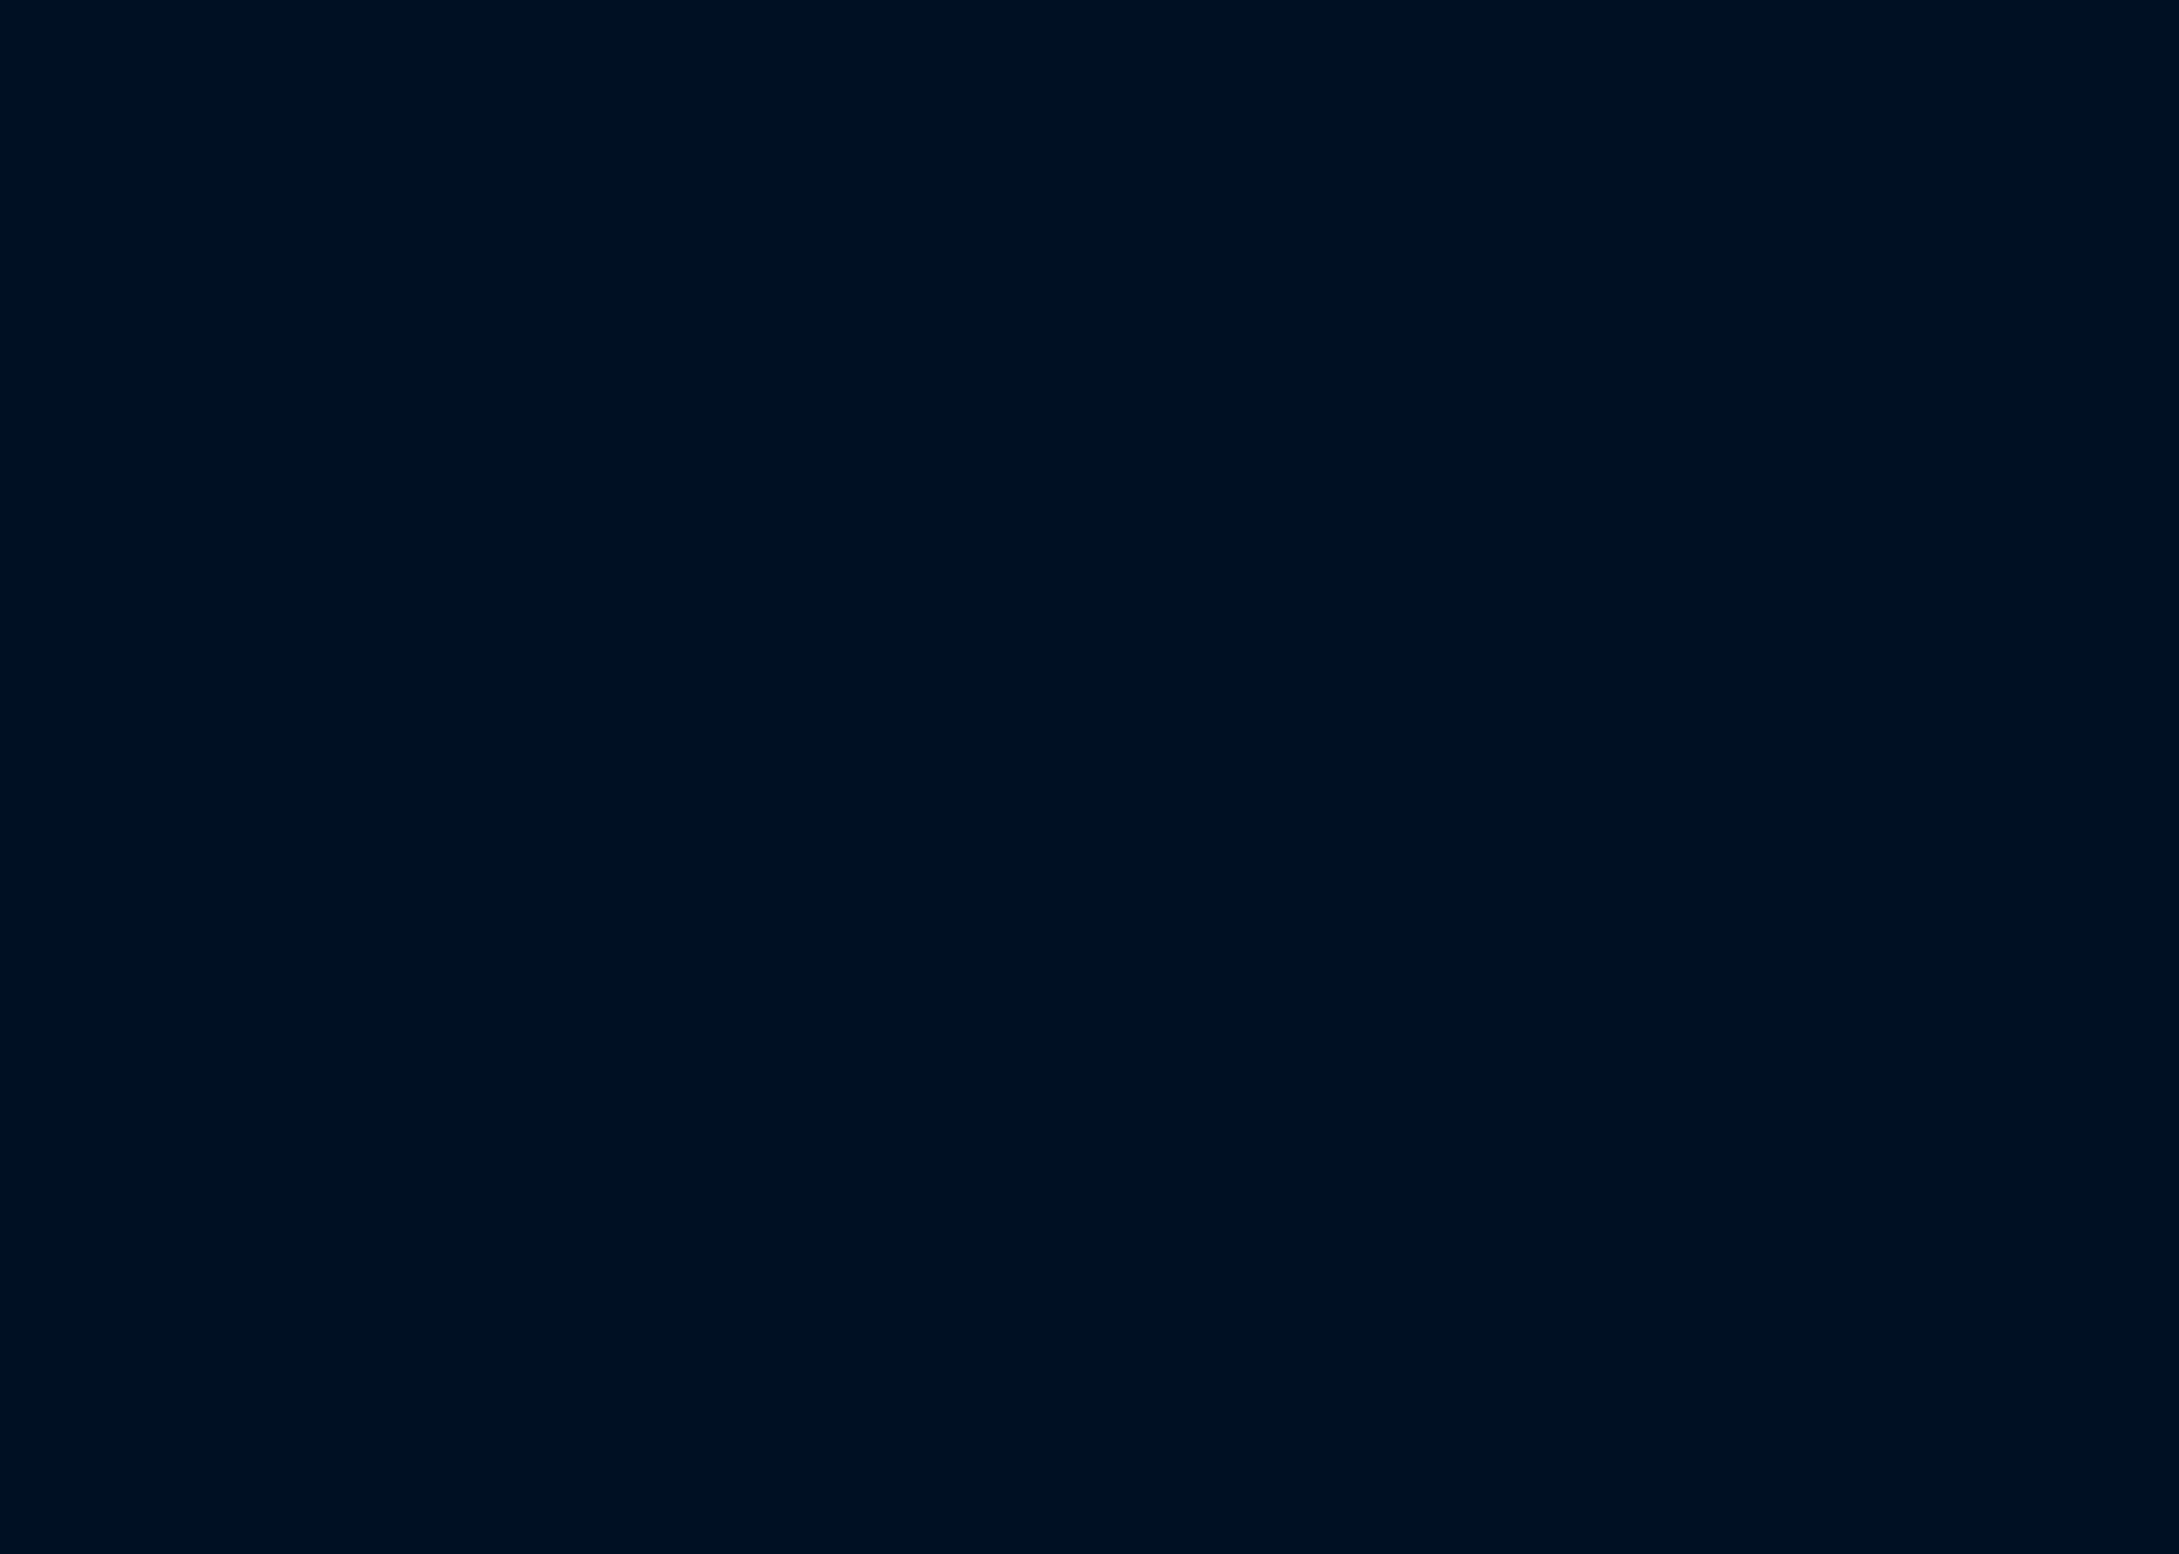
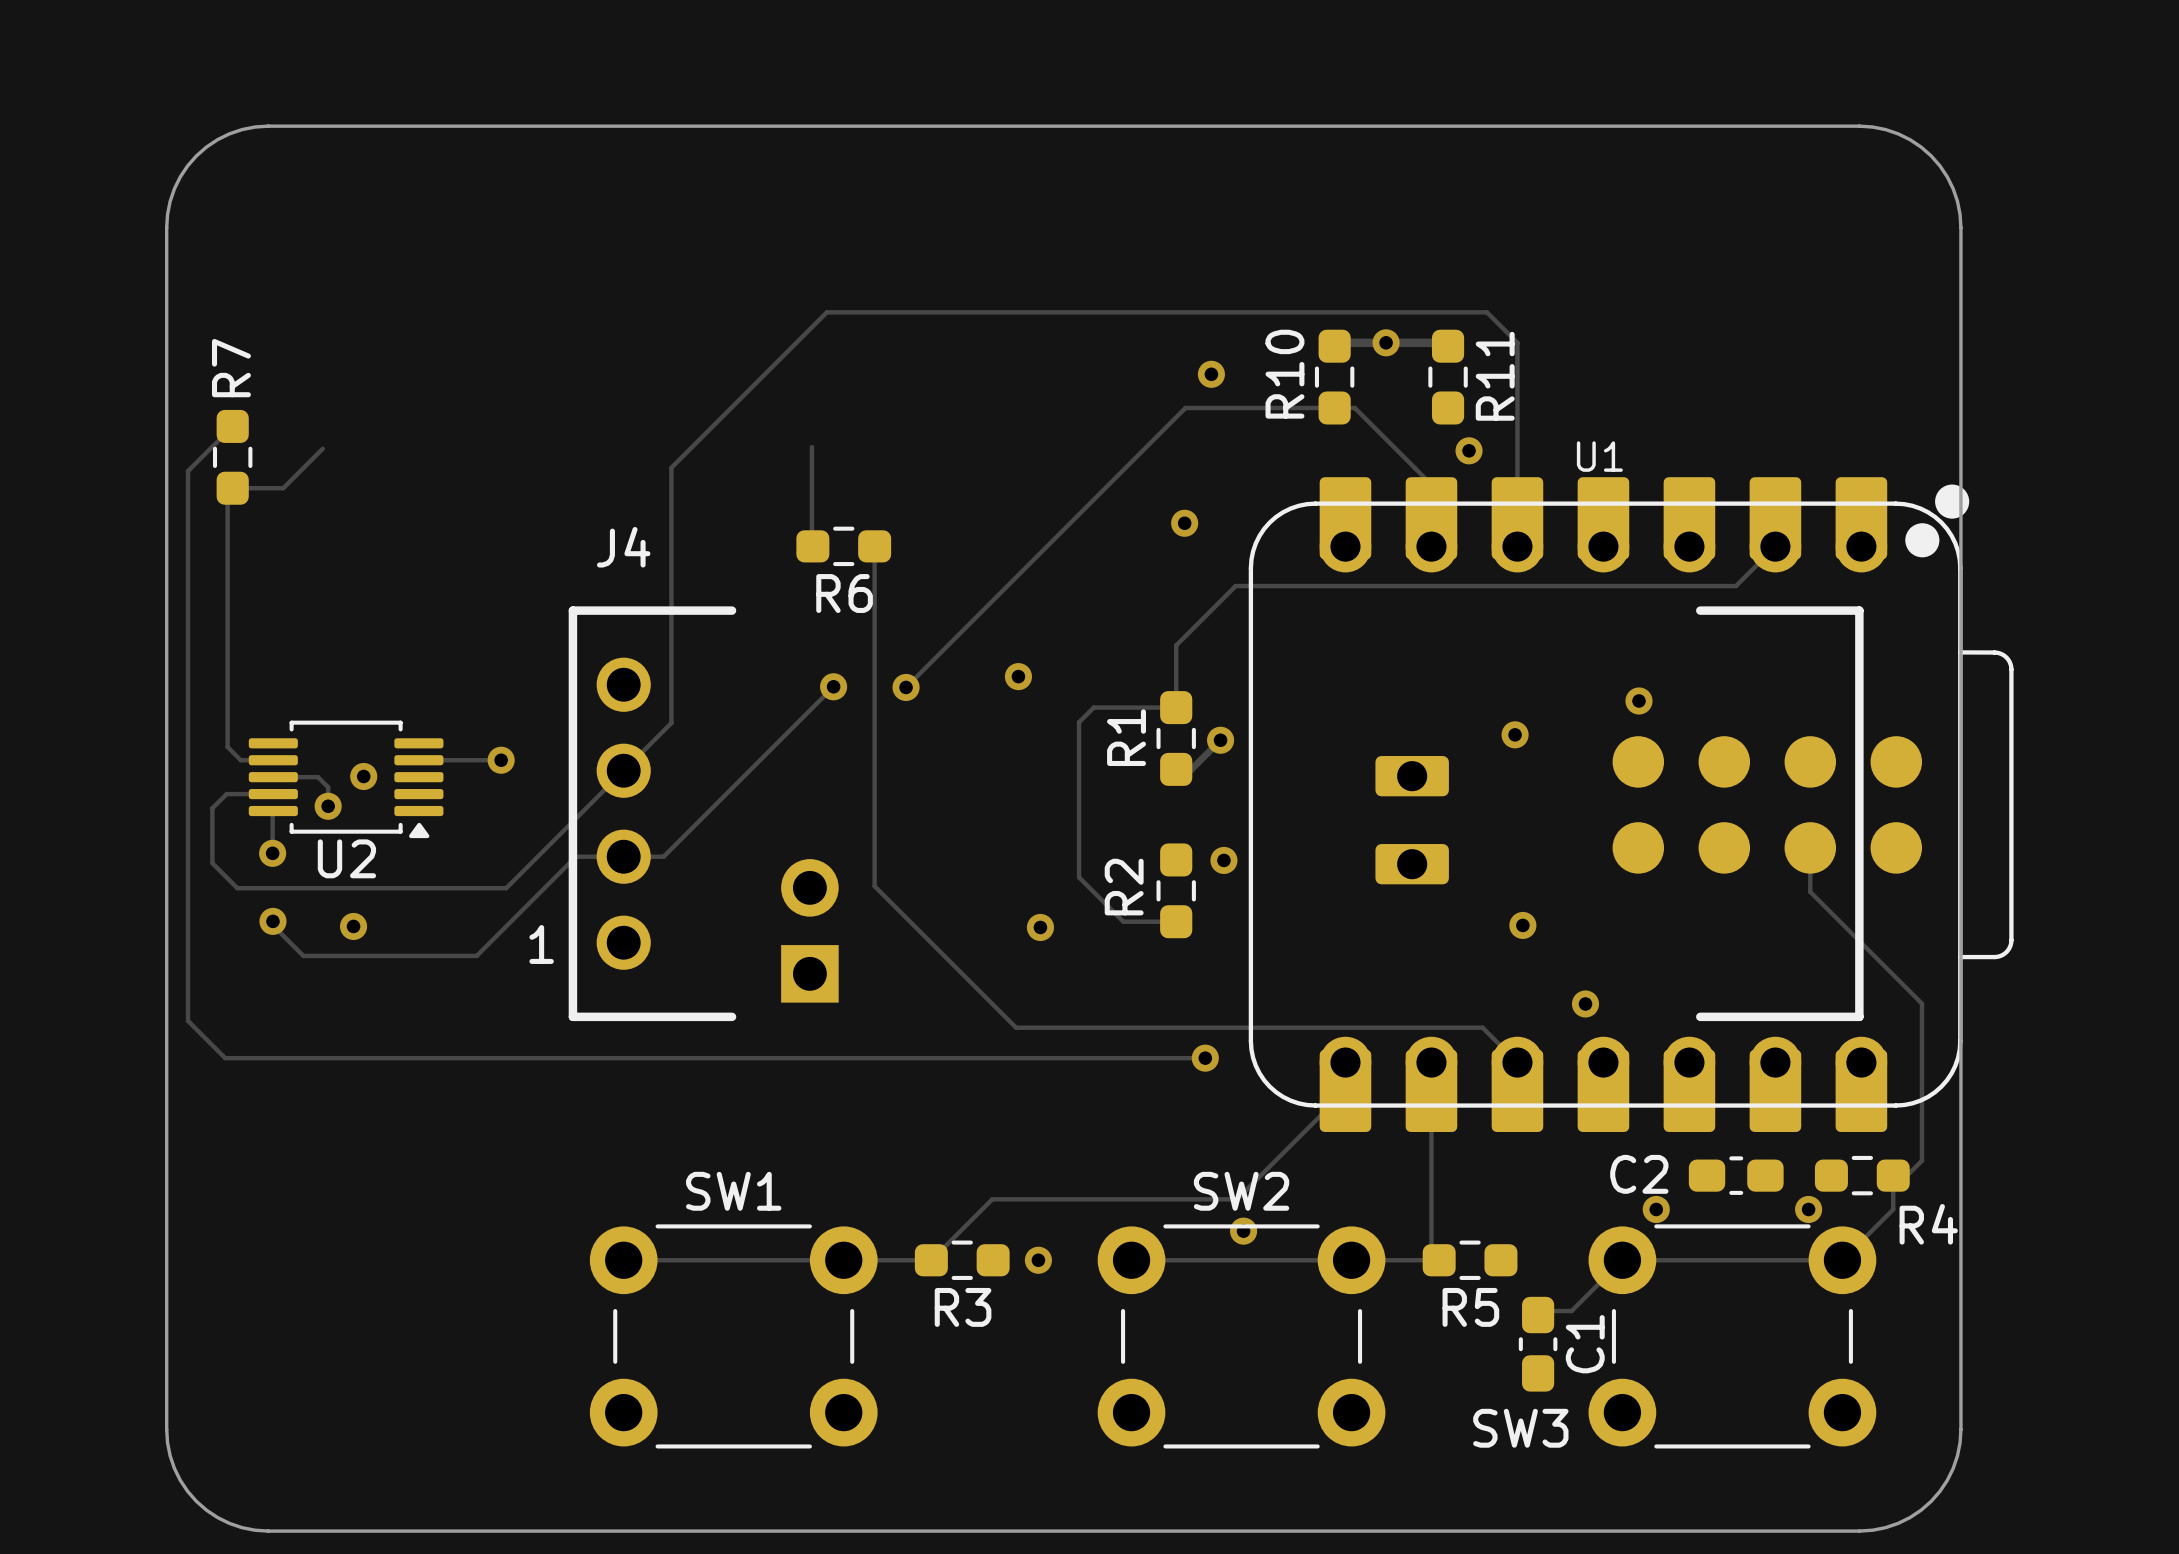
board edge: none -> (268, 126) (1859, 126) (1885, 129) (1910, 139) (1921, 147) (1931, 155) (1947, 176) (1957, 201) (1960, 227) (1960, 1429) (1960, 1442) (1953, 1468) (1939, 1491) (1921, 1510) (1898, 1523) (1872, 1530) (1859, 1531) (268, 1531) (241, 1527) (229, 1523) (206, 1510) (187, 1491) (174, 1468) (167, 1442) (166, 1429) (166, 227) (170, 201) (174, 188) (180, 176) (196, 155) (217, 139) (229, 133) (241, 129) (268, 126)
via: none -> (1386, 342)
track: none -> (1334, 346) (1338, 342) (1432, 342) (1436, 346)
via: none -> (1211, 374)
R10: none -> (1334, 377)
R11: none -> (1448, 377)
track: none -> (232, 426) (188, 471) (188, 1020) (225, 1058) (1205, 1058)
track: none -> (811, 447) (812, 546)
track: none -> (322, 448) (283, 488) (232, 488) (227, 493) (227, 747) (240, 760) (273, 760)
via: none -> (1469, 450)
R7: none -> (232, 457)
track: none -> (1431, 518) (1431, 484) (1354, 407) (1185, 407) (906, 687)
track: none -> (1517, 518) (1517, 342) (1486, 312) (826, 312) (671, 467) (671, 723) (506, 888) (237, 888) (212, 863) (212, 808) (226, 794) (273, 794)
via: none -> (1184, 523)
R6: none -> (843, 546)
track: none -> (874, 546) (874, 886) (1016, 1027) (1482, 1027) (1517, 1062)
track: none -> (1775, 546) (1735, 586) (1235, 586) (1176, 645) (1176, 707) (1093, 707) (1079, 722) (1079, 877) (1123, 921) (1176, 921)
via: none -> (1018, 676)
track: none -> (833, 686) (663, 856) (575, 856) (476, 955) (303, 955) (272, 925) (272, 921)
via: none -> (833, 686)
via: none -> (906, 687)
via: none -> (1638, 700)
via: none -> (1515, 734)
R1: none -> (1176, 738)
track: none -> (1220, 740) (1191, 769) (1176, 769)
via: none -> (1220, 740)
track: none -> (418, 760) (501, 760)
via: none -> (501, 760)
via: none -> (363, 776)
track: none -> (273, 777) (318, 777) (328, 787) (328, 806)
U2: none -> (346, 779)
U1: none -> (1631, 804)
via: none -> (328, 806)
track: none -> (273, 811) (272, 853)
J4: none -> (1216, 813)
track: none -> (1810, 847) (1810, 891) (1922, 1003) (1922, 1160) (1907, 1175) (1893, 1175) (1893, 1209) (1842, 1260) (1622, 1260) (1571, 1311) (1542, 1311) (1538, 1315)
via: none -> (272, 853)
via: none -> (1223, 860)
R2: none -> (1176, 890)
via: none -> (272, 921)
via: none -> (1522, 925)
via: none -> (353, 926)
via: none -> (1040, 927)
part: none -> (809, 930)
via: none -> (1585, 1003)
via: none -> (1205, 1058)
track: none -> (1345, 1090) (1236, 1199) (992, 1199) (931, 1260) (623, 1260)
track: none -> (1431, 1090) (1431, 1252) (1439, 1260) (1131, 1260)
C2: none -> (1736, 1175)
R4: none -> (1862, 1175)
via: none -> (1656, 1209)
via: none -> (1808, 1209)
via: none -> (1243, 1231)
R3: none -> (962, 1260)
via: none -> (1038, 1260)
R5: none -> (1470, 1260)
SW1: none -> (733, 1336)
SW2: none -> (1241, 1336)
SW3: none -> (1732, 1336)
C1: none -> (1538, 1344)

